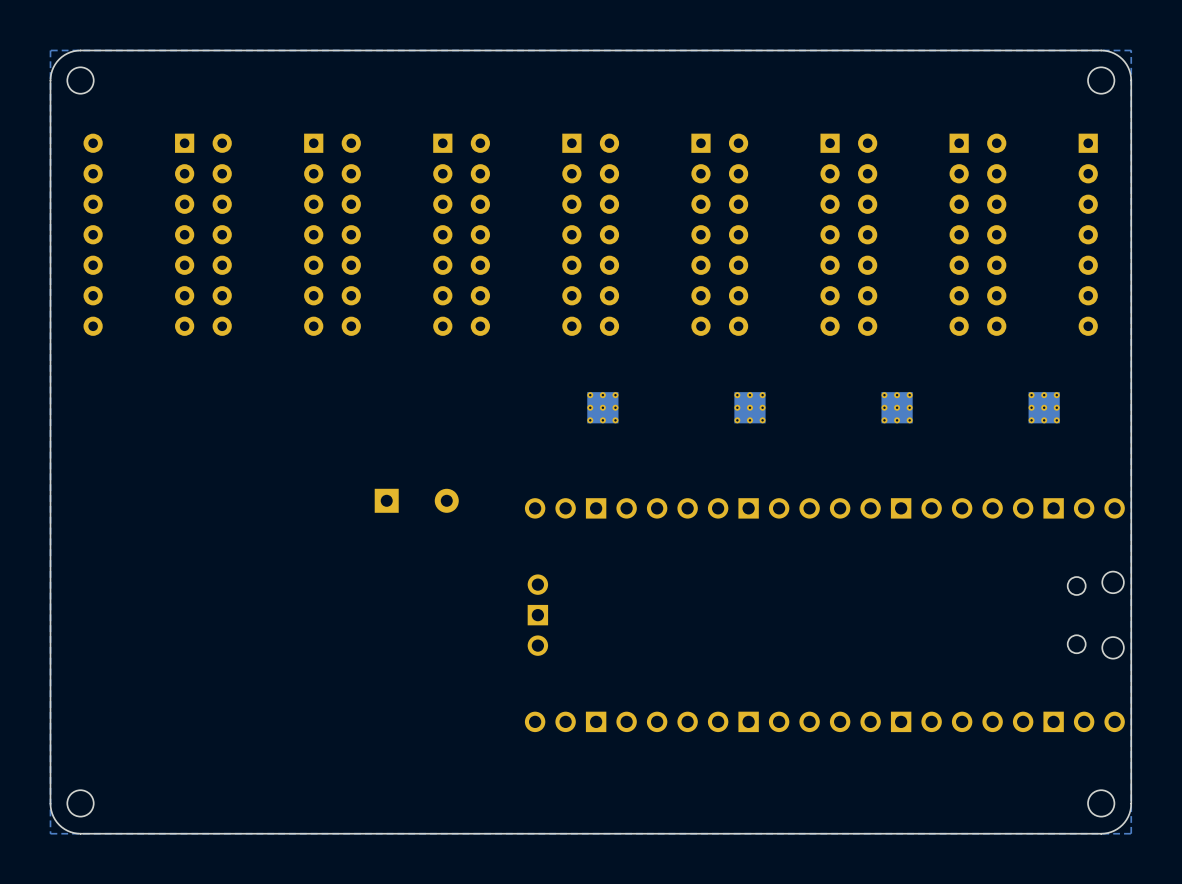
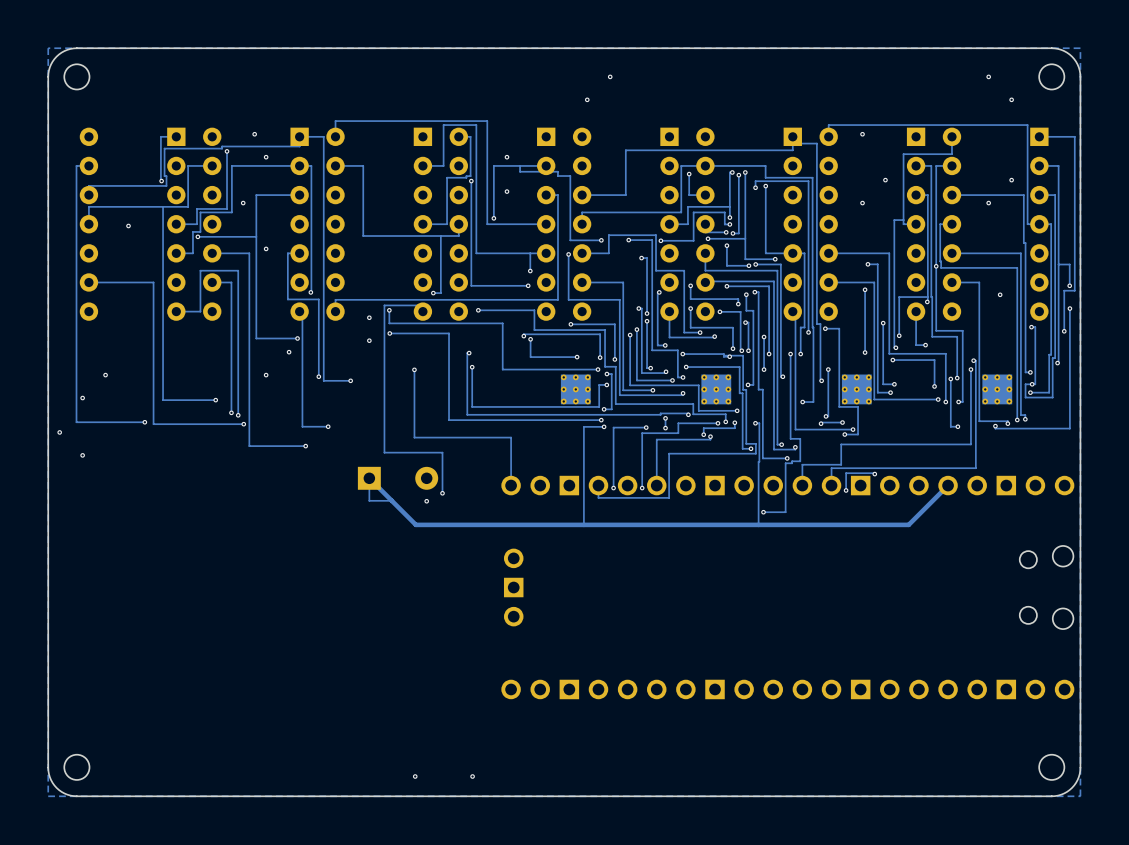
via: none -> (610, 76)
via: none -> (988, 76)
via: none -> (587, 99)
via: none -> (1011, 99)
via: none -> (254, 134)
via: none -> (862, 134)
track: none -> (176, 136) (160, 136) (161, 181)
track: none -> (335, 136) (335, 121) (487, 121) (487, 224) (546, 224)
track: none -> (458, 136) (470, 136) (470, 176) (447, 177) (447, 224) (422, 224)
track: none -> (792, 136) (792, 150) (625, 150) (625, 195) (582, 195)
track: none -> (828, 136) (828, 125) (1027, 125) (1027, 224) (1051, 224) (1051, 354) (1049, 354) (1049, 392) (1030, 392)
track: none -> (951, 136) (951, 154) (903, 154) (903, 224) (916, 224)
track: none -> (1039, 136) (1074, 136) (1074, 290) (1064, 290) (1064, 331)
track: none -> (792, 143) (816, 143) (816, 324) (820, 324) (821, 380)
track: none -> (227, 151) (227, 208) (196, 208) (196, 224) (176, 224)
via: none -> (227, 151)
via: none -> (266, 157)
via: none -> (506, 157)
track: none -> (88, 165) (76, 165) (76, 422) (144, 422)
track: none -> (212, 165) (188, 165) (188, 206) (88, 206) (88, 224)
track: none -> (335, 165) (363, 165) (363, 235) (458, 235) (458, 224)
track: none -> (422, 165) (443, 165) (443, 125) (476, 125) (476, 253) (546, 253)
track: none -> (520, 165) (520, 171) (557, 171) (557, 176) (570, 176) (570, 240) (601, 240)
track: none -> (546, 165) (493, 165) (493, 218)
track: none -> (916, 165) (931, 165) (932, 336) (957, 336) (957, 378)
track: none -> (951, 165) (936, 165) (936, 330) (962, 330) (962, 401) (958, 401)
track: none -> (1039, 165) (1058, 165) (1057, 363)
track: none -> (732, 172) (729, 172) (729, 206)
via: none -> (732, 172)
track: none -> (745, 172) (745, 259) (775, 259)
via: none -> (745, 172)
track: none -> (689, 174) (689, 195) (705, 195)
via: none -> (689, 174)
track: none -> (738, 175) (738, 233) (732, 233)
via: none -> (738, 175)
via: none -> (885, 180)
via: none -> (1011, 180)
via: none -> (161, 181)
track: none -> (471, 181) (471, 285) (528, 285)
via: none -> (471, 181)
track: none -> (765, 186) (765, 253) (804, 253) (804, 327) (800, 327) (800, 354)
via: none -> (765, 186)
track: none -> (755, 187) (755, 181) (808, 181) (808, 332)
via: none -> (755, 187)
via: none -> (506, 191)
track: none -> (88, 195) (88, 185) (166, 185) (164, 148) (299, 146) (299, 136) (323, 136) (323, 380) (350, 380)
track: none -> (299, 195) (256, 195) (256, 338) (297, 338)
track: none -> (546, 195) (557, 195) (557, 299) (335, 299) (335, 311)
track: none -> (916, 195) (927, 195) (927, 301)
track: none -> (951, 195) (1023, 195) (1025, 372) (1030, 372)
track: none -> (1039, 195) (1055, 195) (1055, 358) (1052, 358) (1052, 397) (1025, 397) (1025, 384) (1035, 384) (1035, 327) (1031, 327)
via: none -> (243, 203)
via: none -> (862, 203)
via: none -> (988, 203)
track: none -> (163, 206) (163, 400) (215, 400)
track: none -> (729, 217) (729, 206) (687, 206) (687, 224) (669, 224)
via: none -> (729, 217)
via: none -> (493, 218)
track: none -> (903, 220) (894, 220) (894, 347) (895, 347)
track: none -> (582, 224) (582, 212) (681, 212) (681, 165) (765, 165) (765, 177) (812, 177) (813, 402) (802, 402)
track: none -> (705, 224) (705, 232) (726, 232)
track: none -> (729, 224) (724, 224) (724, 212) (693, 212) (693, 240) (660, 240)
via: none -> (729, 224)
track: none -> (951, 224) (940, 224) (941, 267) (1017, 267) (1017, 419)
via: none -> (128, 225)
via: none -> (726, 232)
via: none -> (732, 233)
via: none -> (197, 236)
track: none -> (256, 236) (197, 236)
track: none -> (440, 235) (440, 293) (433, 293)
via: none -> (708, 238)
track: none -> (745, 238) (708, 238)
via: none -> (601, 240)
track: none -> (628, 240) (652, 240) (652, 350) (677, 350) (677, 377) (683, 377)
via: none -> (628, 240)
via: none -> (660, 240)
track: none -> (726, 245) (726, 265) (748, 265)
via: none -> (726, 245)
via: none -> (266, 248)
track: none -> (176, 253) (192, 253) (192, 231) (200, 231) (200, 212) (231, 212) (231, 165) (311, 165) (310, 292)
track: none -> (212, 253) (249, 253) (249, 446) (305, 446)
track: none -> (299, 253) (287, 253) (287, 299) (318, 299) (318, 376)
track: none -> (530, 253) (530, 271)
track: none -> (582, 253) (608, 253) (608, 235) (656, 235) (656, 270) (684, 270) (684, 332) (700, 332)
track: none -> (705, 253) (705, 270) (777, 270) (777, 444) (781, 444)
track: none -> (828, 253) (889, 253) (889, 353) (945, 353) (945, 402)
track: none -> (951, 253) (1020, 253) (1020, 415) (1025, 415) (1025, 419)
track: none -> (568, 254) (568, 299) (619, 299) (619, 395) (683, 395) (683, 393)
via: none -> (568, 254)
track: none -> (641, 258) (647, 258) (647, 313)
via: none -> (641, 258)
via: none -> (775, 259)
track: none -> (755, 264) (780, 264) (780, 376) (782, 376)
via: none -> (755, 264)
track: none -> (867, 264) (877, 264) (877, 392) (890, 392)
via: none -> (867, 264)
track: none -> (1058, 264) (1069, 264) (1069, 285)
via: none -> (748, 265)
via: none -> (936, 266)
via: none -> (530, 271)
track: none -> (88, 282) (153, 282) (153, 424) (243, 424)
track: none -> (212, 282) (231, 282) (231, 412)
track: none -> (582, 282) (623, 282) (623, 390) (652, 390)
track: none -> (705, 282) (773, 281) (773, 449) (795, 449) (795, 447)
track: none -> (828, 282) (874, 282) (874, 399) (938, 399)
track: none -> (951, 282) (979, 282) (979, 421) (1007, 421) (1007, 423)
via: none -> (528, 285)
track: none -> (690, 285) (690, 299) (738, 299) (738, 304)
via: none -> (690, 285)
track: none -> (726, 286) (769, 286) (769, 354)
via: none -> (726, 286)
via: none -> (1069, 285)
track: none -> (865, 289) (865, 352)
via: none -> (865, 289)
track: none -> (754, 292) (758, 292) (758, 389) (762, 389) (762, 458) (787, 458)
via: none -> (754, 292)
via: none -> (310, 292)
via: none -> (433, 293)
track: none -> (659, 292) (657, 292) (657, 345) (665, 345)
via: none -> (659, 292)
track: none -> (746, 294) (746, 310) (753, 310) (753, 384) (748, 384)
via: none -> (746, 294)
via: none -> (1000, 294)
track: none -> (927, 297) (899, 297) (899, 335)
via: none -> (927, 301)
via: none -> (738, 304)
track: none -> (638, 308) (641, 308) (641, 373) (666, 371)
via: none -> (638, 308)
track: none -> (690, 308) (690, 327) (732, 327) (732, 348)
via: none -> (690, 308)
track: none -> (1069, 308) (1069, 428) (995, 428) (995, 426)
via: none -> (1069, 308)
track: none -> (389, 310) (389, 323) (502, 323) (502, 369) (598, 369)
via: none -> (389, 310)
track: none -> (478, 310) (534, 310) (534, 330) (605, 330) (605, 366) (615, 366) (615, 404) (693, 404) (693, 414) (725, 414) (725, 421)
via: none -> (478, 310)
track: none -> (176, 311) (200, 311) (200, 270) (238, 270) (238, 415)
track: none -> (299, 311) (302, 311) (302, 426) (328, 426)
track: none -> (422, 311) (422, 305) (384, 305) (384, 452) (442, 452) (442, 493)
track: none -> (669, 311) (669, 337) (714, 336)
track: none -> (719, 311) (740, 311) (741, 350)
via: none -> (719, 311)
track: none -> (792, 311) (795, 311) (795, 429) (853, 429)
track: none -> (916, 311) (916, 345) (925, 345)
via: none -> (647, 313)
via: none -> (369, 317)
track: none -> (647, 321) (647, 368) (650, 368)
via: none -> (647, 321)
track: none -> (745, 322) (748, 322) (748, 350)
via: none -> (745, 322)
track: none -> (883, 323) (883, 384) (894, 384)
via: none -> (883, 323)
track: none -> (570, 324) (614, 324) (614, 359)
via: none -> (570, 324)
via: none -> (1031, 327)
track: none -> (825, 328) (839, 328) (839, 406) (858, 406) (858, 434) (844, 434)
via: none -> (825, 328)
track: none -> (636, 329) (636, 380) (672, 380)
via: none -> (636, 329)
via: none -> (1064, 331)
via: none -> (700, 332)
via: none -> (808, 332)
track: none -> (389, 333) (449, 333) (449, 420) (601, 420)
via: none -> (389, 333)
track: none -> (630, 335) (630, 385) (698, 385) (698, 410) (737, 410)
via: none -> (630, 335)
track: none -> (523, 336) (523, 334) (600, 334) (600, 357)
via: none -> (523, 336)
via: none -> (899, 335)
via: none -> (714, 336)
track: none -> (764, 337) (764, 369)
via: none -> (764, 337)
via: none -> (297, 338)
track: none -> (530, 339) (530, 357) (577, 357)
via: none -> (530, 339)
via: none -> (369, 340)
via: none -> (665, 345)
via: none -> (925, 345)
via: none -> (895, 347)
via: none -> (732, 348)
via: none -> (741, 350)
via: none -> (748, 350)
via: none -> (289, 352)
track: none -> (469, 353) (467, 353) (467, 414) (688, 414)
via: none -> (469, 353)
via: none -> (865, 352)
track: none -> (682, 354) (723, 354) (723, 356) (729, 356)
via: none -> (682, 354)
via: none -> (769, 354)
track: none -> (790, 354) (790, 438) (800, 438) (800, 461) (785, 463) (785, 512) (763, 512)
via: none -> (790, 354)
via: none -> (800, 354)
track: none -> (723, 355) (743, 355) (743, 389) (746, 389) (746, 443) (755, 443) (755, 453) (669, 453) (669, 497) (598, 497) (598, 485)
via: none -> (577, 357)
via: none -> (729, 356)
via: none -> (600, 357)
via: none -> (614, 359)
track: none -> (892, 360) (934, 360) (934, 386)
via: none -> (892, 360)
track: none -> (973, 360) (975, 360) (975, 468) (831, 468) (831, 485)
via: none -> (973, 360)
via: none -> (1057, 363)
track: none -> (472, 367) (472, 406) (599, 406) (599, 384) (606, 384)
via: none -> (472, 367)
track: none -> (686, 367) (739, 367) (739, 393) (742, 393) (742, 448) (751, 448)
via: none -> (686, 367)
via: none -> (650, 368)
via: none -> (598, 369)
track: none -> (828, 369) (828, 416) (825, 416)
via: none -> (828, 369)
track: none -> (970, 369) (970, 444) (841, 444) (841, 464) (802, 464) (802, 485)
via: none -> (970, 369)
track: none -> (414, 369) (414, 437) (511, 437) (511, 485)
via: none -> (414, 369)
via: none -> (764, 369)
via: none -> (666, 371)
via: none -> (1030, 372)
track: none -> (606, 374) (611, 374) (611, 409) (604, 409)
via: none -> (606, 374)
via: none -> (105, 375)
via: none -> (266, 375)
via: none -> (318, 376)
via: none -> (782, 376)
via: none -> (683, 377)
via: none -> (957, 378)
track: none -> (950, 378) (950, 426) (957, 426)
via: none -> (950, 378)
via: none -> (350, 380)
via: none -> (672, 380)
via: none -> (821, 380)
via: none -> (894, 384)
via: none -> (1032, 384)
via: none -> (606, 384)
via: none -> (748, 384)
via: none -> (934, 386)
via: none -> (652, 390)
via: none -> (683, 393)
via: none -> (890, 392)
via: none -> (1030, 392)
via: none -> (82, 398)
via: none -> (215, 400)
via: none -> (938, 399)
via: none -> (802, 402)
via: none -> (945, 402)
via: none -> (958, 401)
via: none -> (604, 409)
via: none -> (737, 410)
via: none -> (231, 412)
via: none -> (238, 415)
via: none -> (688, 414)
via: none -> (825, 416)
track: none -> (665, 418) (665, 428)
via: none -> (665, 418)
via: none -> (601, 420)
via: none -> (1017, 419)
via: none -> (1025, 419)
via: none -> (725, 421)
via: none -> (144, 422)
track: none -> (734, 422) (734, 428) (703, 428) (703, 434)
via: none -> (734, 422)
track: none -> (842, 422) (821, 423)
via: none -> (842, 422)
track: none -> (717, 423) (678, 423) (678, 433) (642, 433) (642, 488)
via: none -> (717, 423)
track: none -> (755, 423) (759, 423) (758, 524)
via: none -> (755, 423)
via: none -> (821, 423)
via: none -> (1007, 423)
via: none -> (243, 424)
via: none -> (328, 426)
track: none -> (604, 426) (583, 426) (583, 524)
via: none -> (604, 426)
via: none -> (957, 426)
via: none -> (995, 426)
track: none -> (646, 427) (613, 427) (613, 488)
via: none -> (646, 427)
via: none -> (665, 428)
via: none -> (853, 429)
via: none -> (59, 432)
via: none -> (844, 434)
via: none -> (703, 434)
track: none -> (710, 436) (710, 439) (656, 439) (656, 485)
via: none -> (710, 436)
via: none -> (781, 444)
via: none -> (305, 446)
via: none -> (795, 447)
via: none -> (751, 448)
via: none -> (82, 455)
via: none -> (787, 458)
track: none -> (874, 474) (846, 473) (846, 490)
via: none -> (874, 474)
track: none -> (948, 485) (908, 524) (415, 524) (369, 478) (369, 500) (391, 500)
via: none -> (613, 488)
via: none -> (642, 488)
via: none -> (846, 490)
via: none -> (442, 493)
via: none -> (426, 501)
via: none -> (763, 512)
via: none -> (415, 776)
via: none -> (472, 776)

